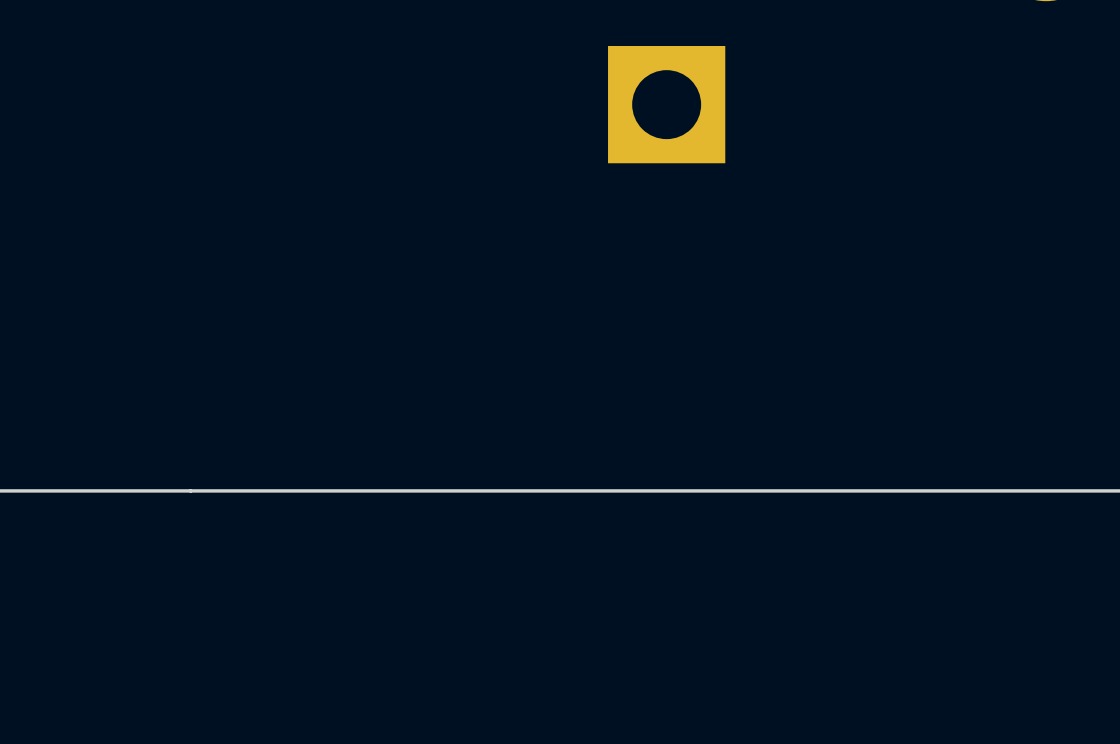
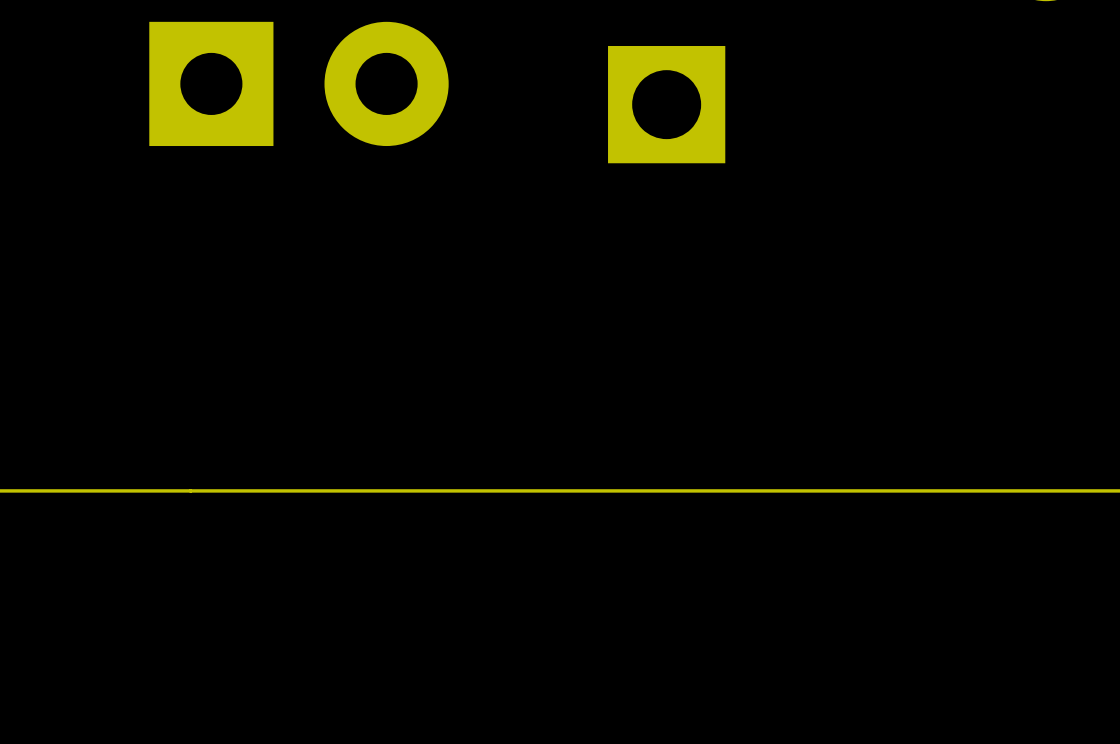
part: none -> (298, 83)

